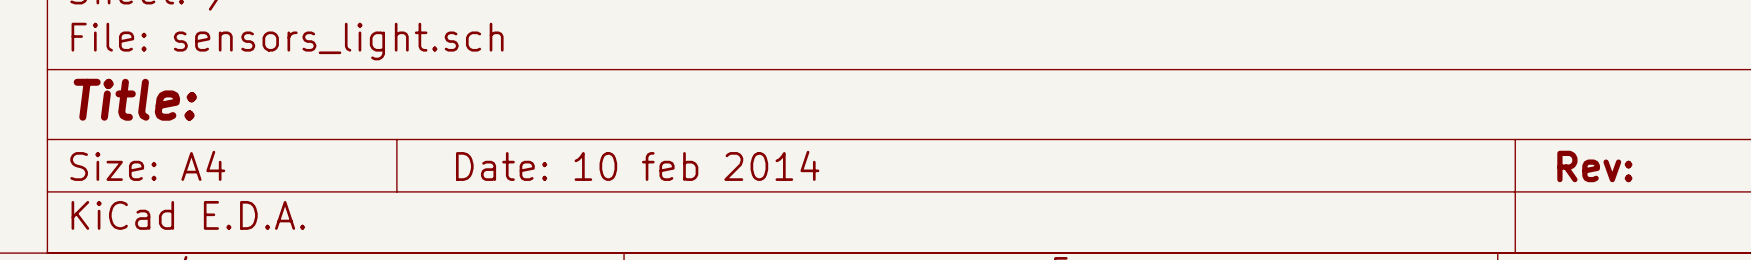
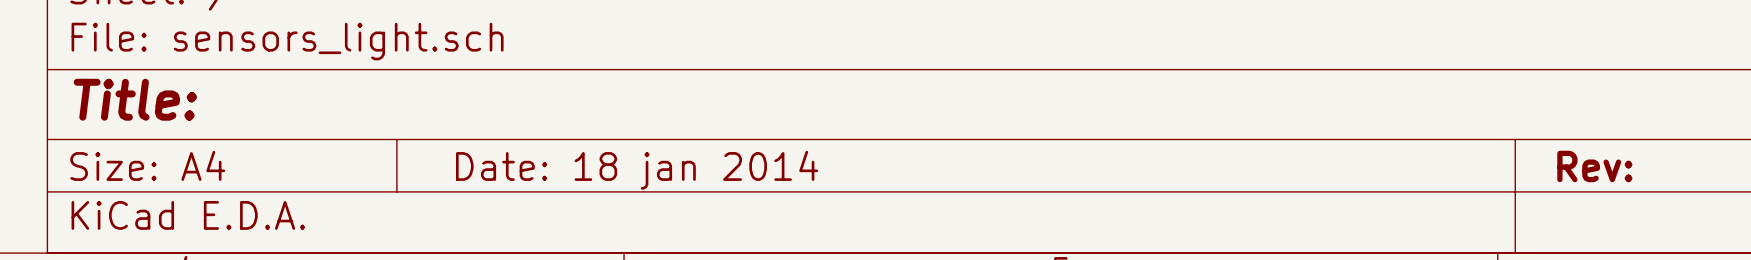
title block: Date: 10 feb 2014 (637, 165) -> Date: 18 jan 2014 (637, 170)

